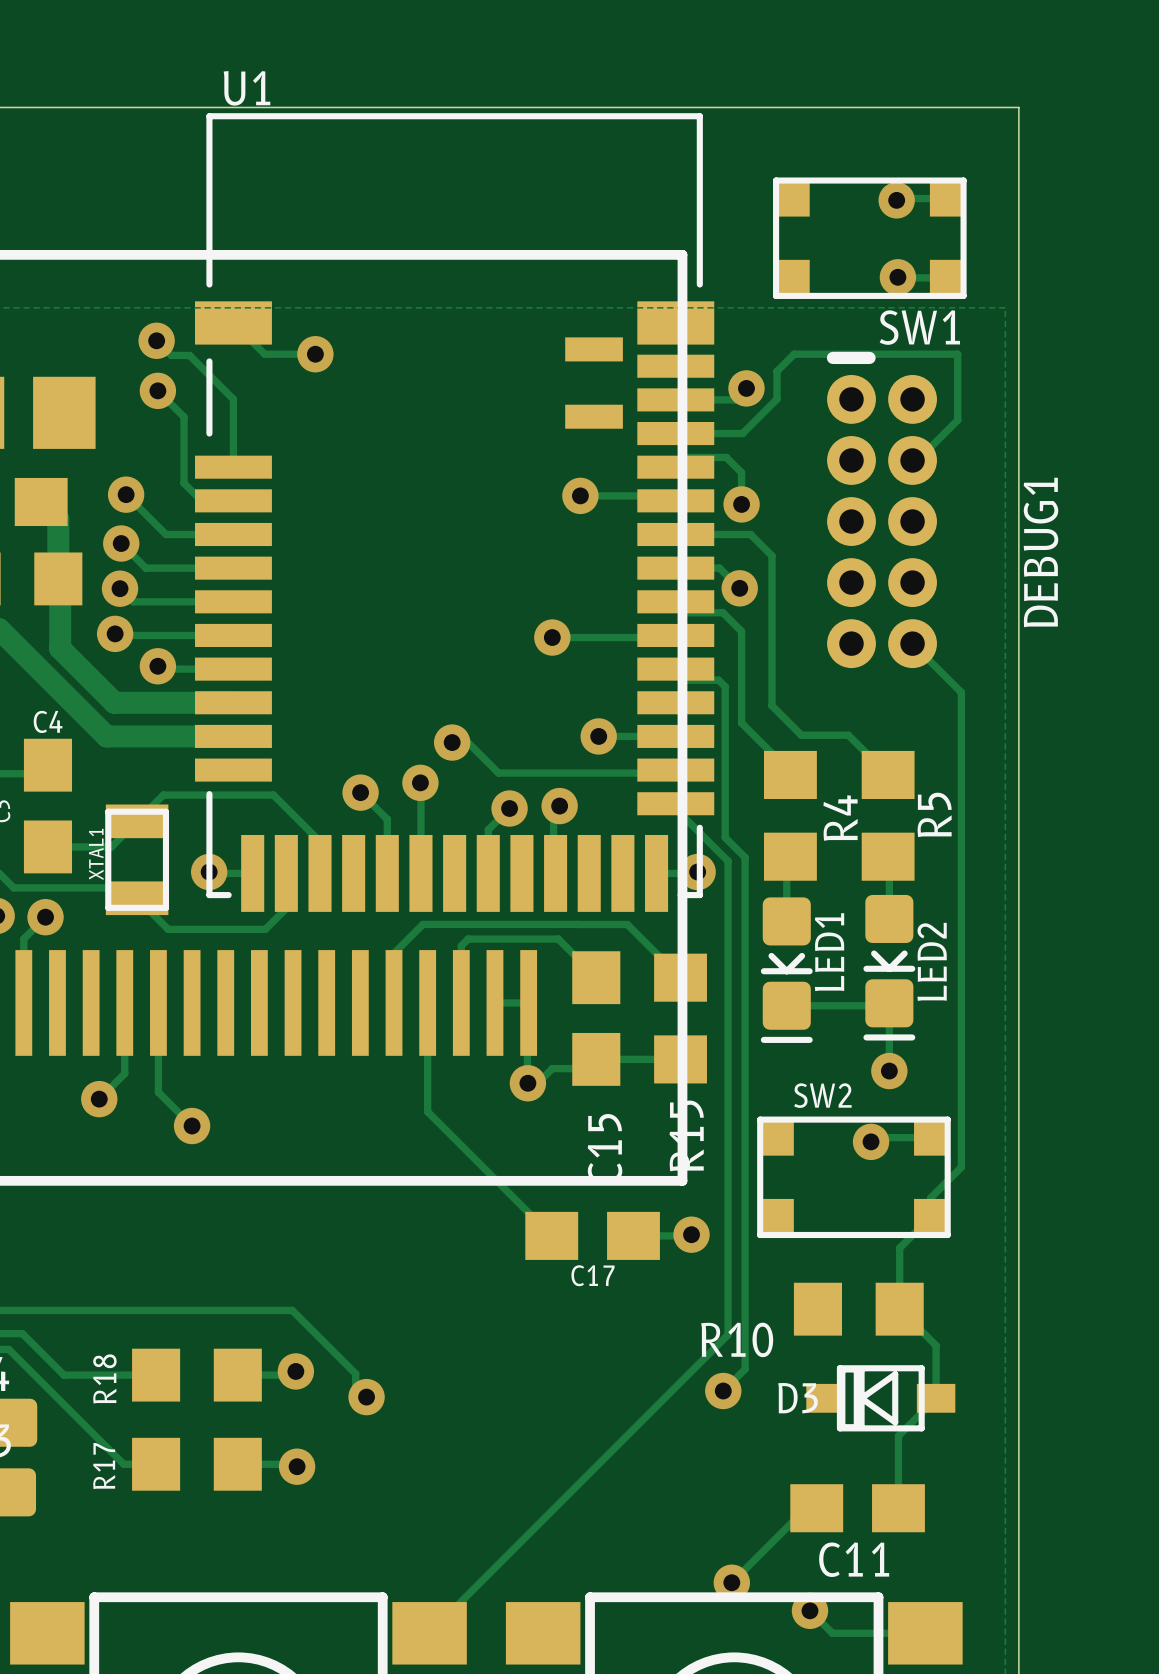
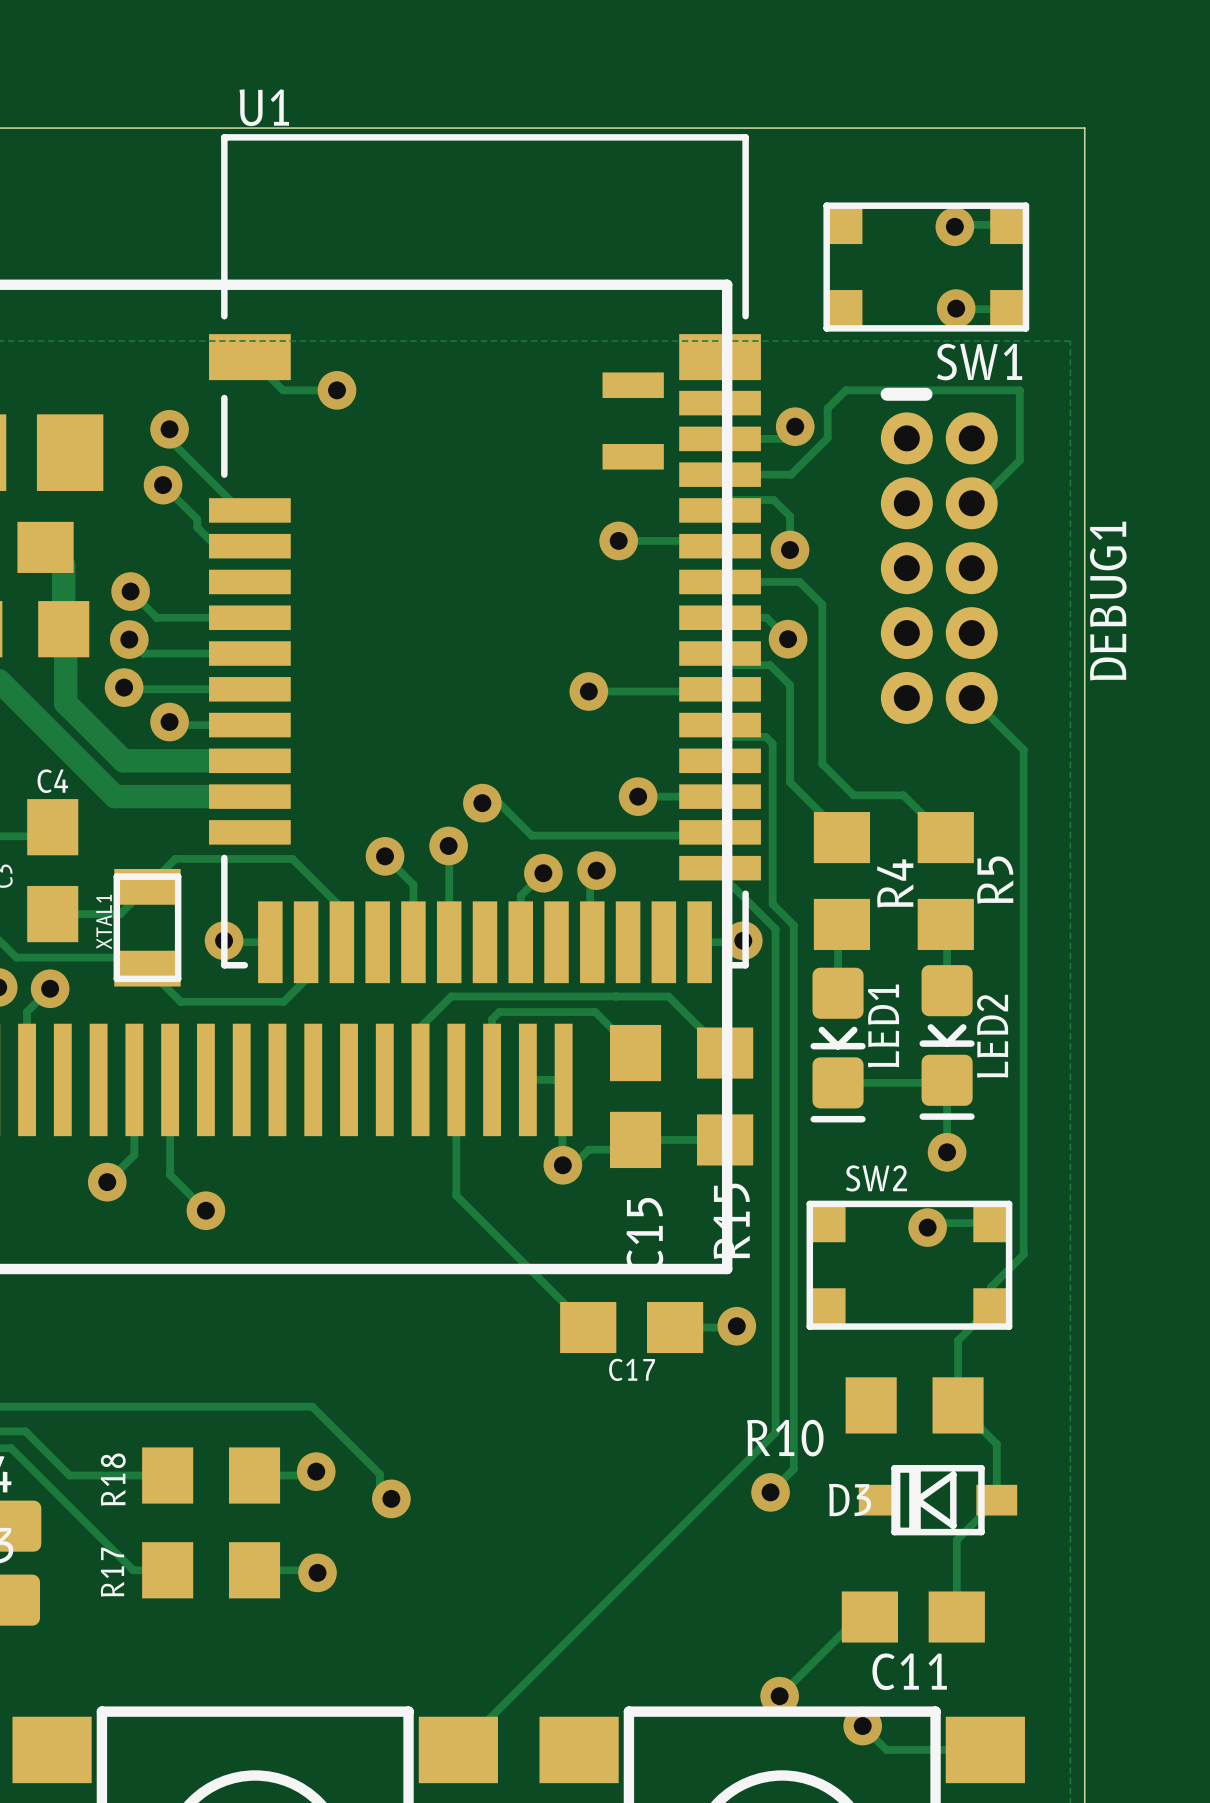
track: (156, 340) (171, 355) (189, 355) (233, 399) (233, 467) -> (174, 429) (174, 444) (240, 510) (249, 510)
via: (156, 340) -> none
track: (157, 390) (184, 417) (184, 475) -> (163, 485) (197, 519)
via: none -> (163, 485)
track: (126, 494) (165, 534) (233, 534) -> none
via: (126, 494) -> none

